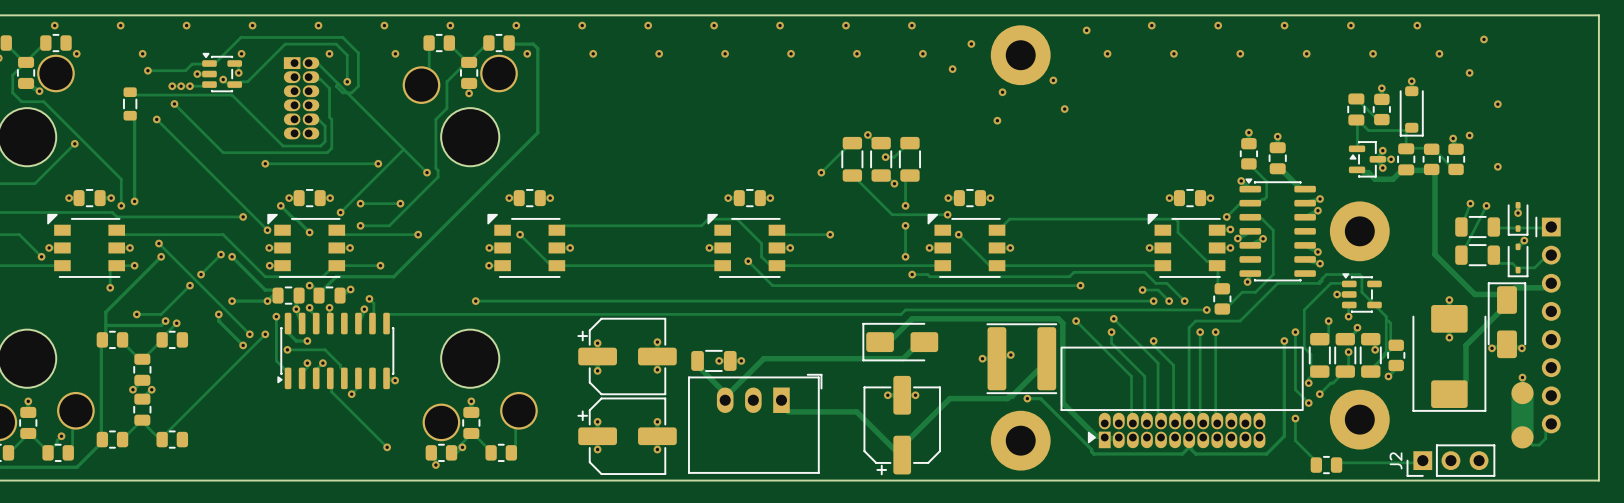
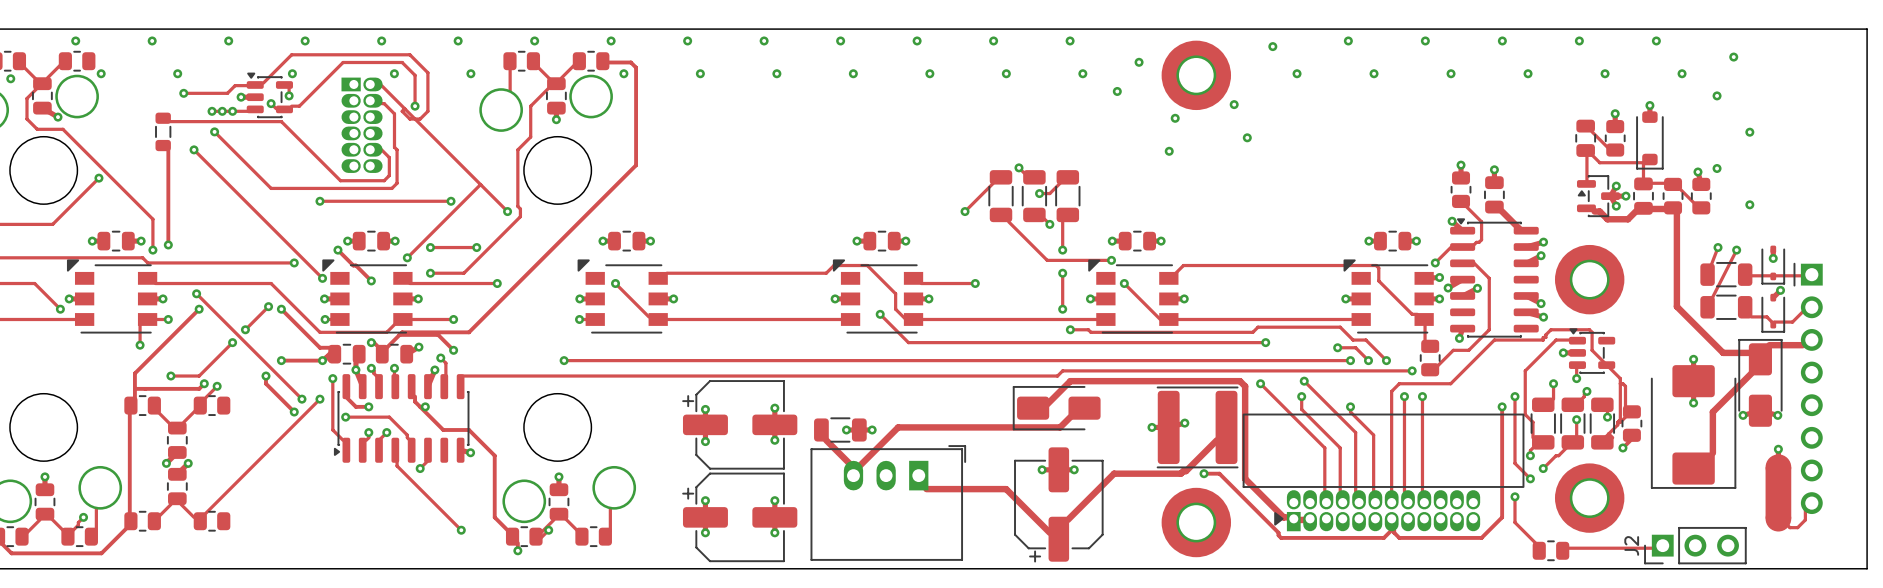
track: none -> (399, 334) (438, 334) (453, 350)
via: none -> (453, 350)
track: none -> (415, 396) (415, 401) (443, 429) (469, 429) (494, 455) (494, 517) (507, 530)
via: none -> (425, 406)

